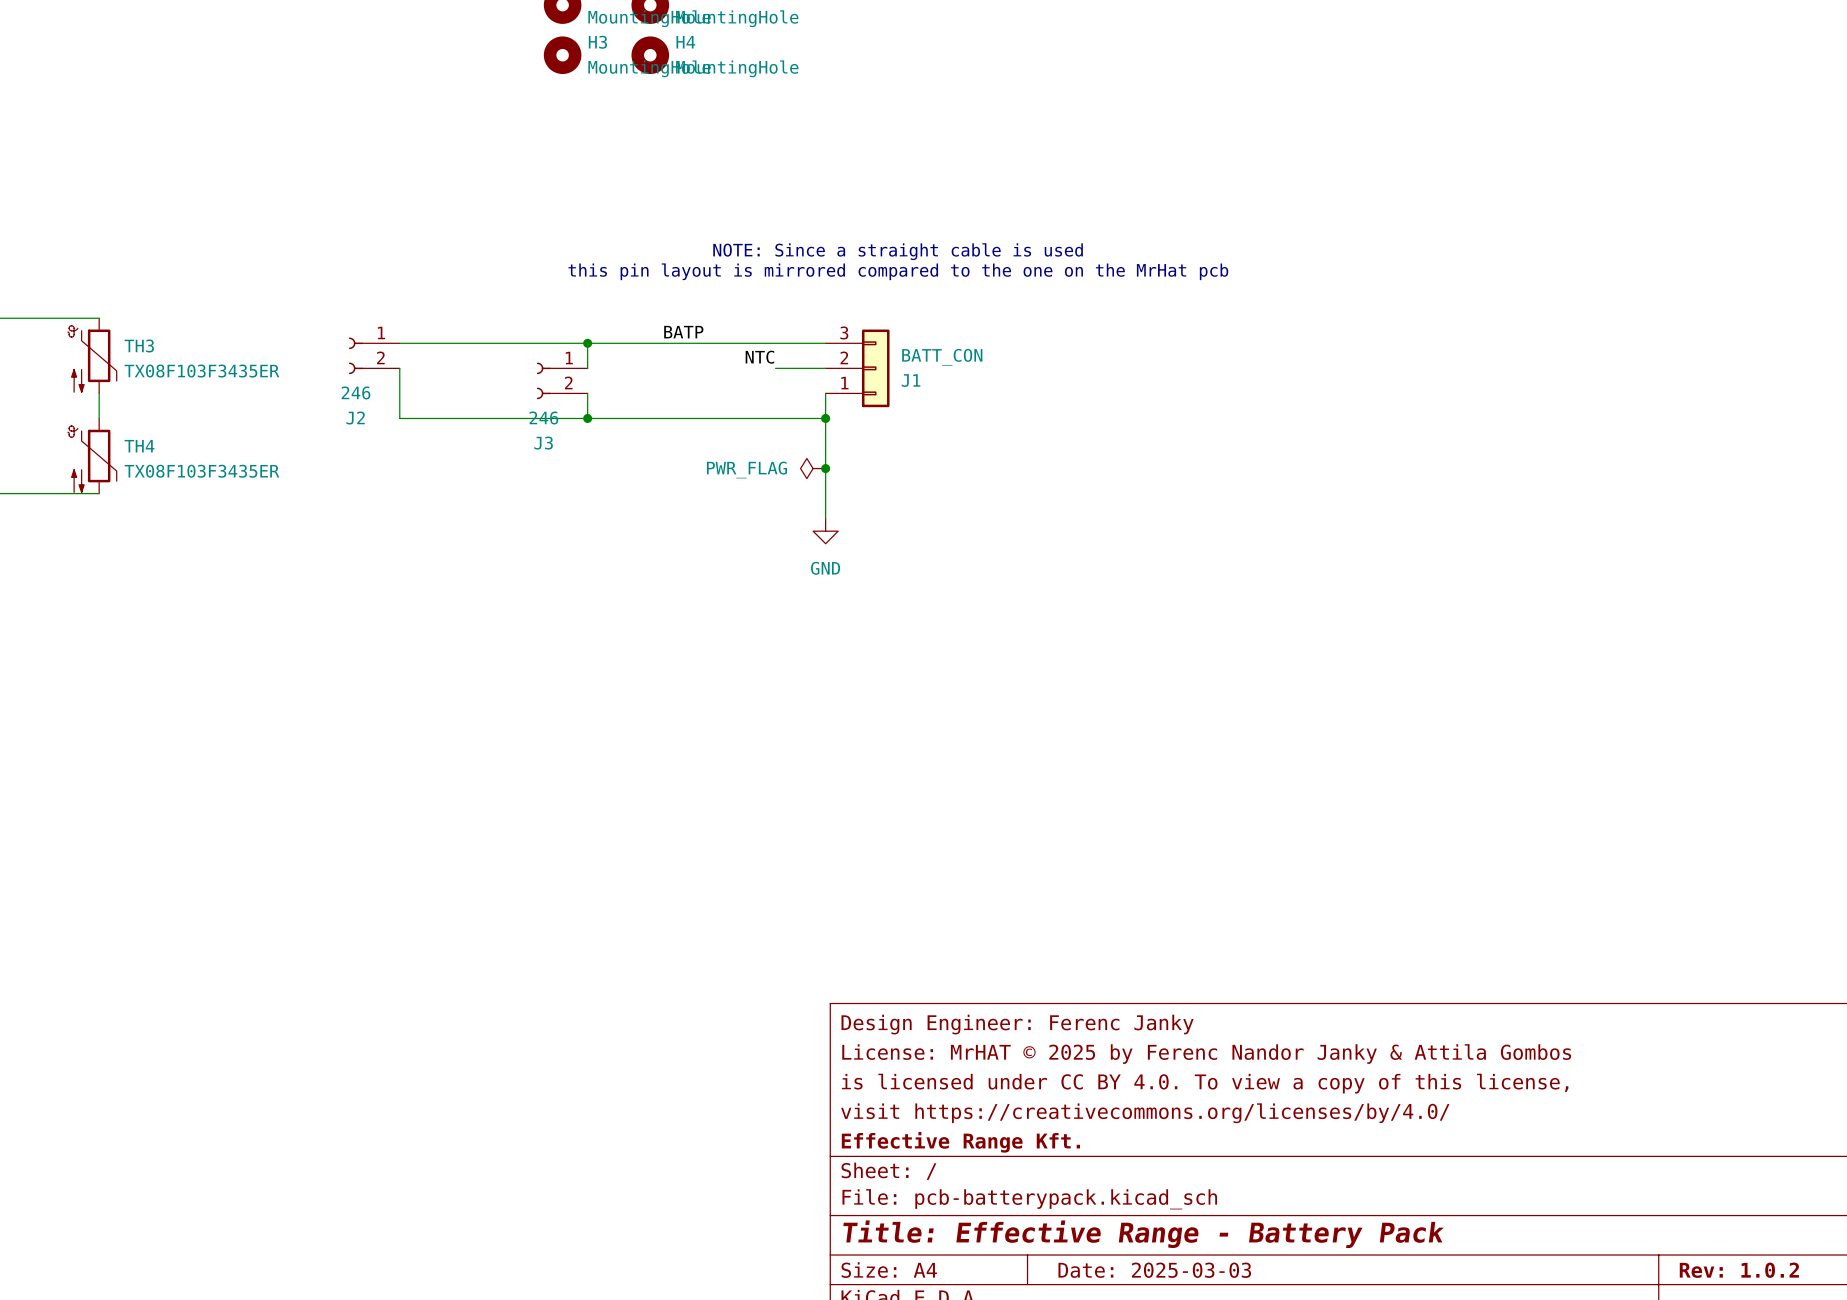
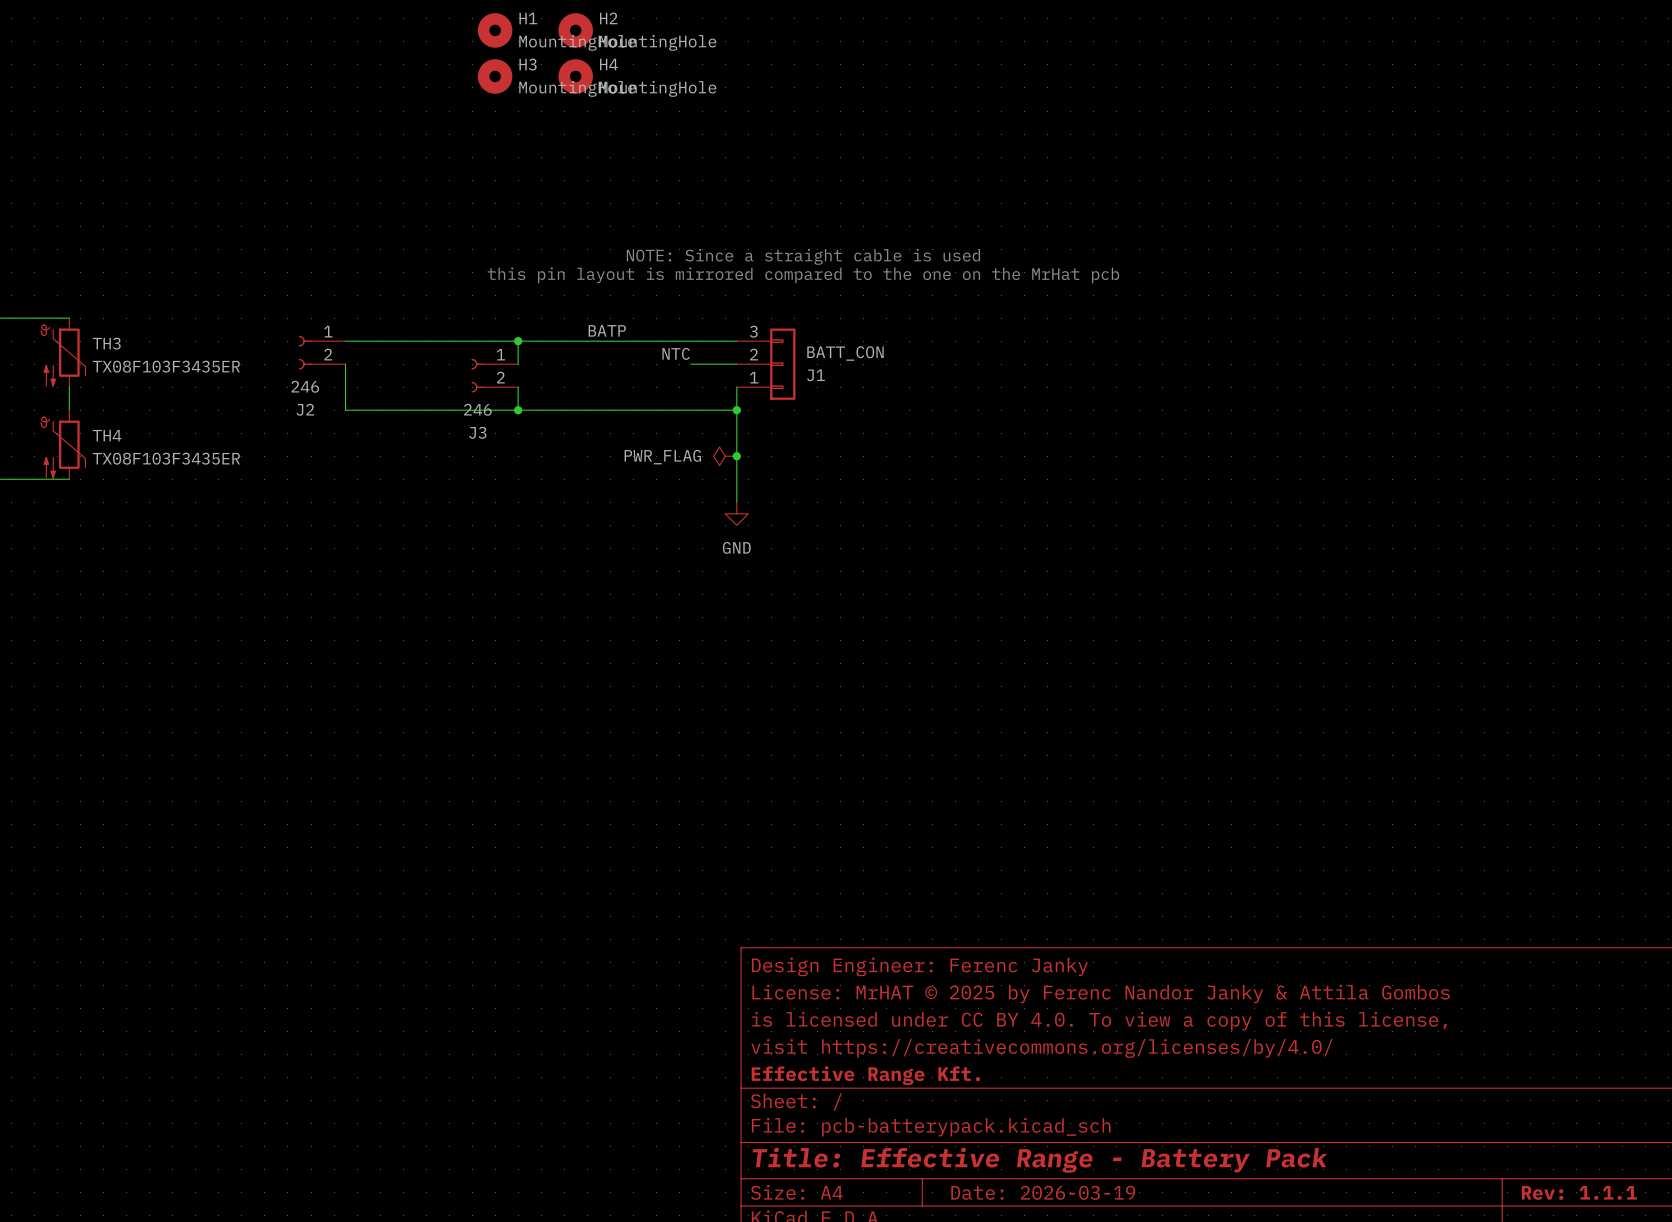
title block: Date: 2025-03-03 (1154, 1270) -> Date: 2026-03-19 (1043, 1192)
title block: Rev: 1.0.2 (1739, 1270) -> Rev: 1.1.1 (1579, 1192)

